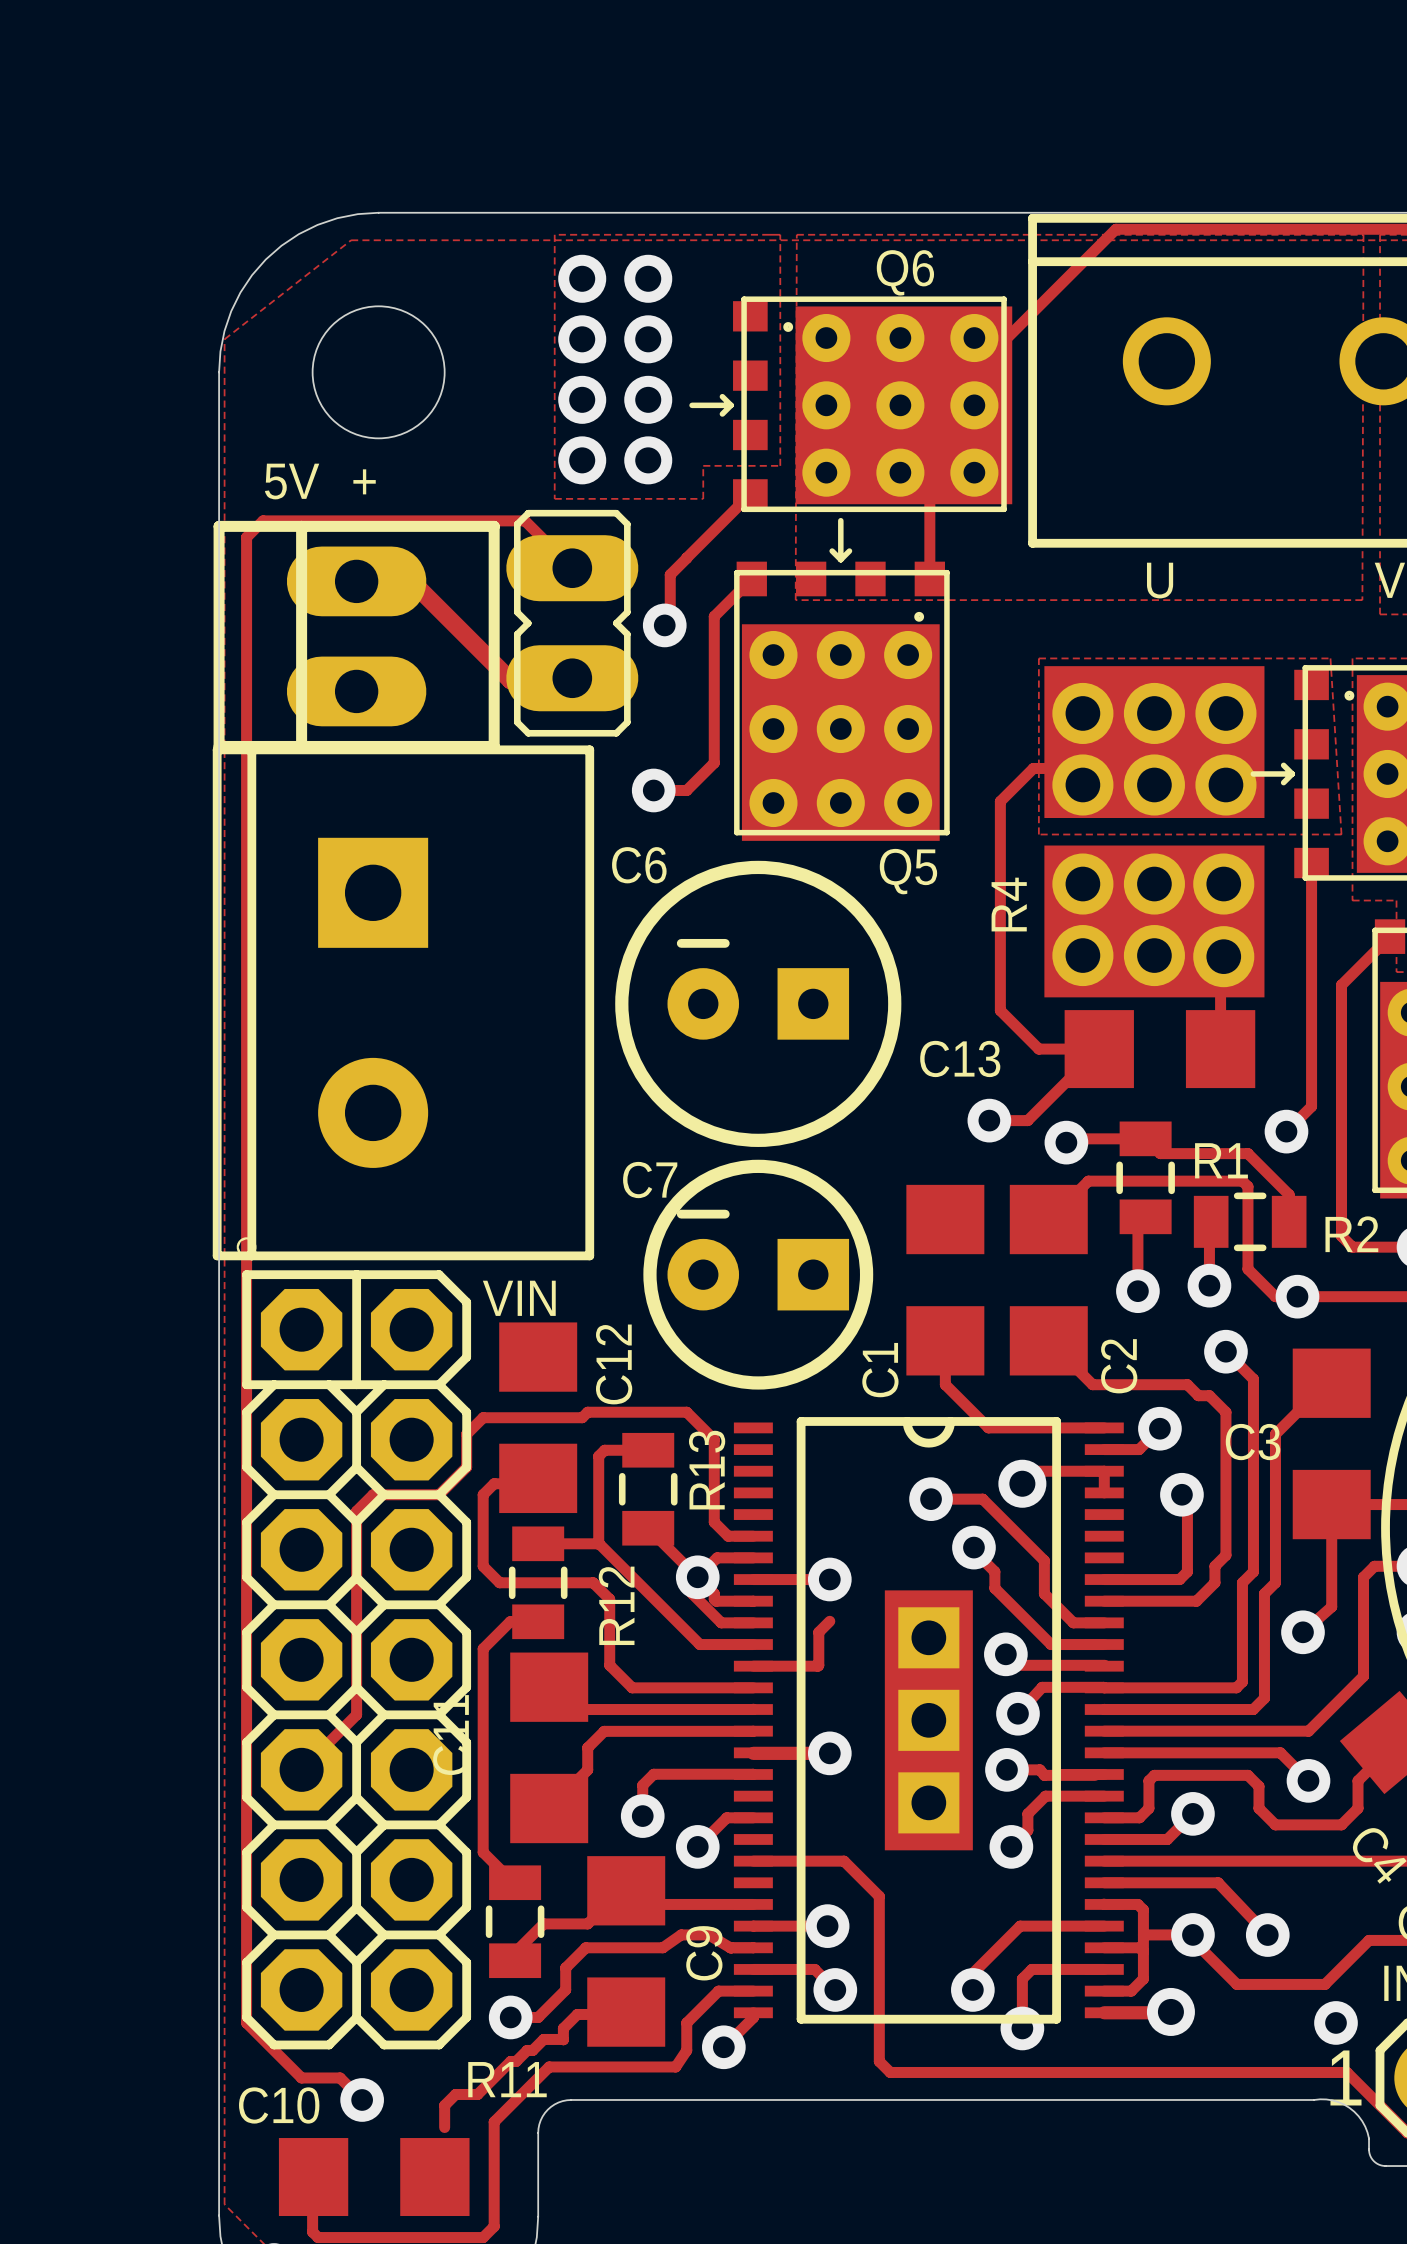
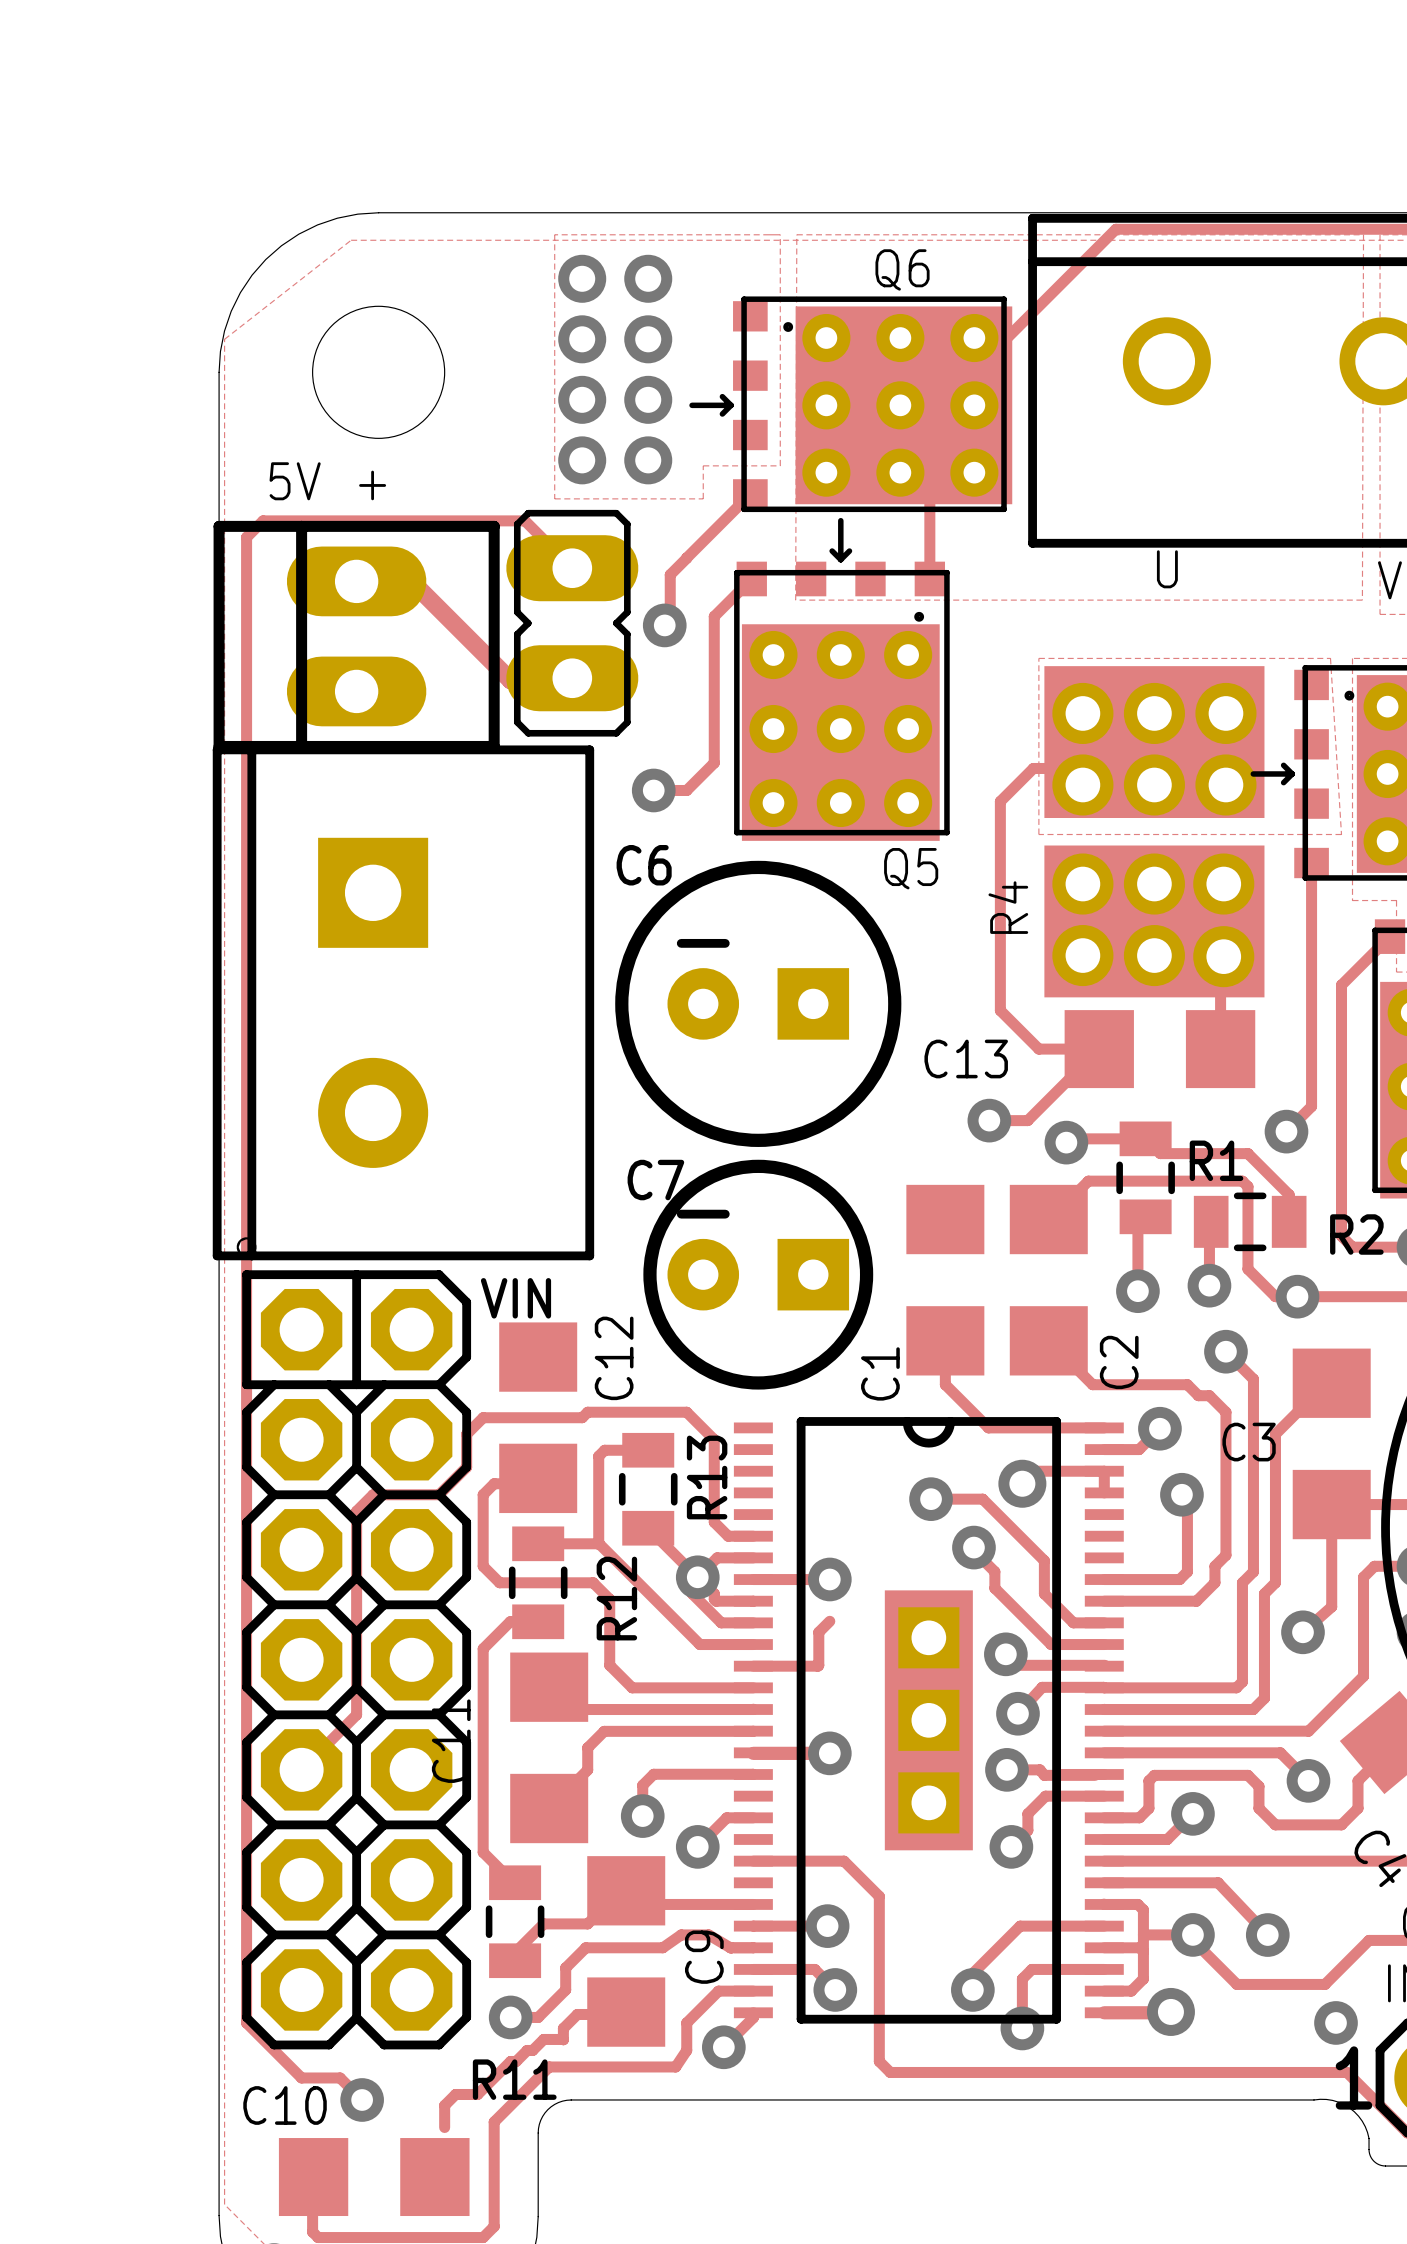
text position: U (1160, 580) -> U (1167, 569)

